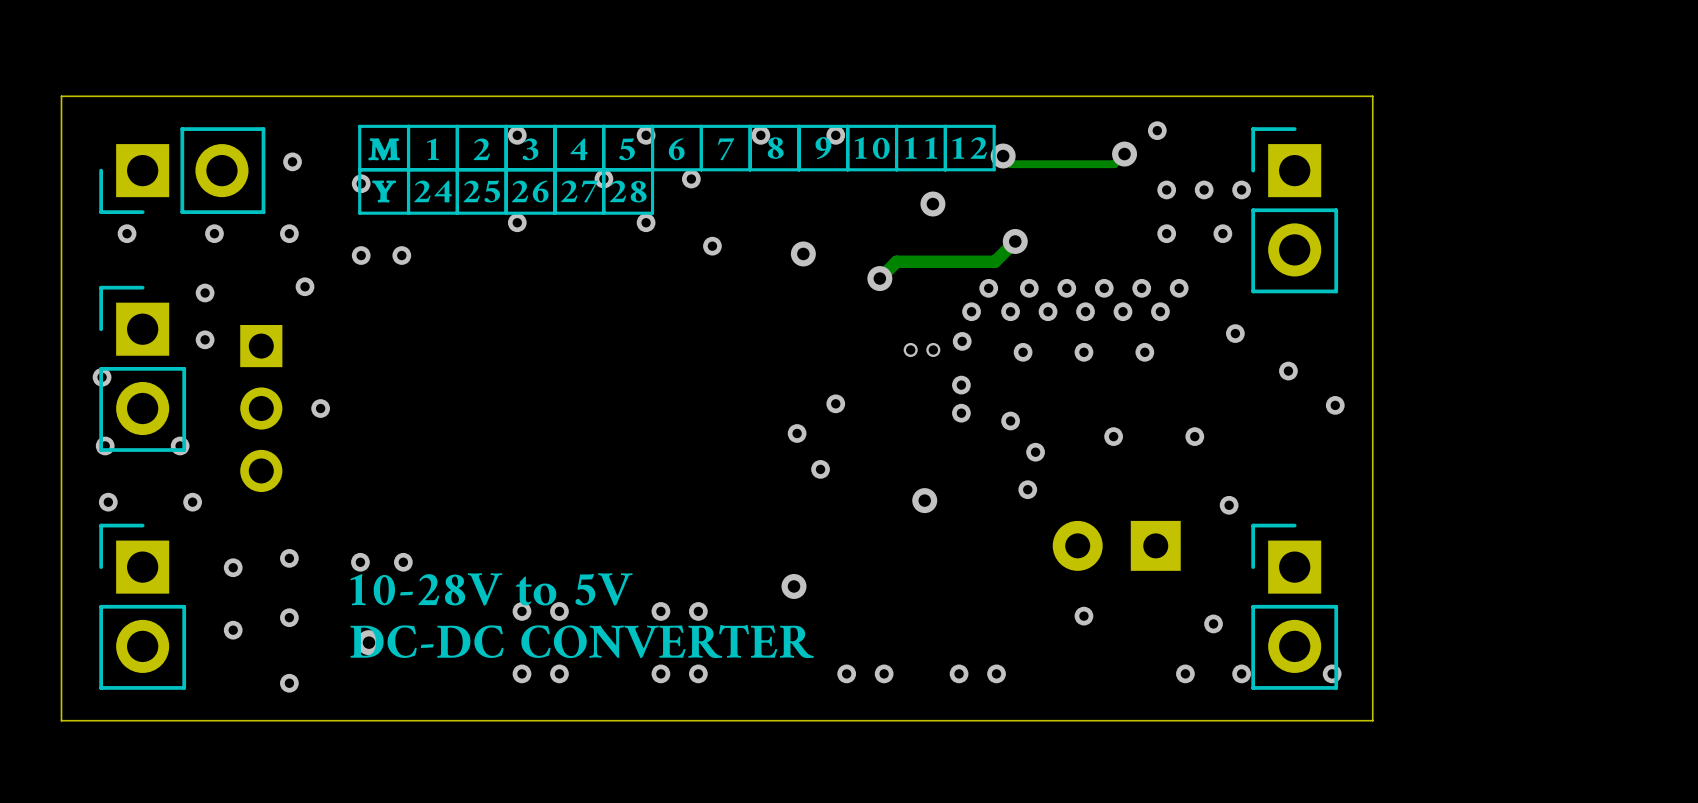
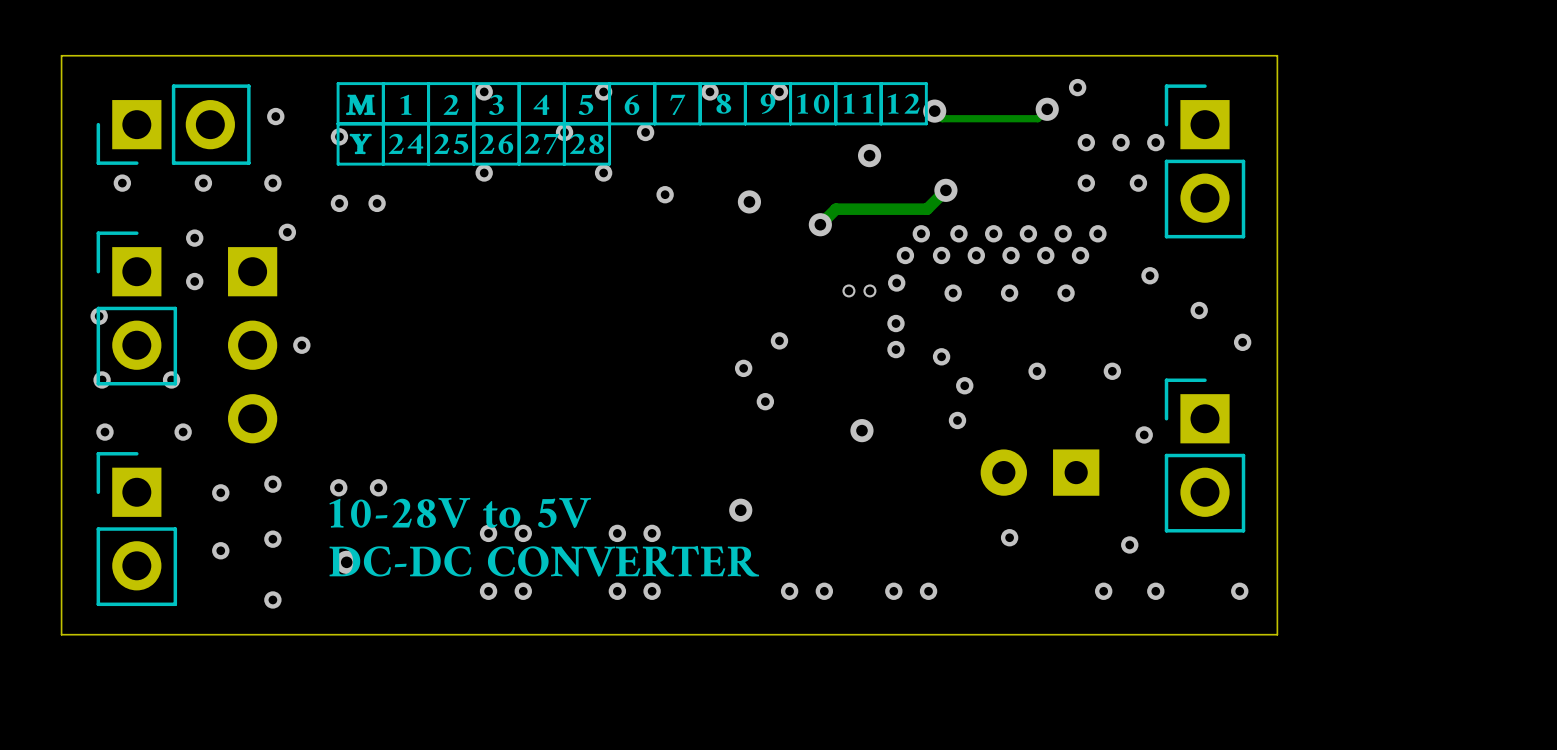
part footprint: [240, 324, 283, 493] -> [228, 247, 278, 444]
part position: (1294, 606) -> (1205, 455)

